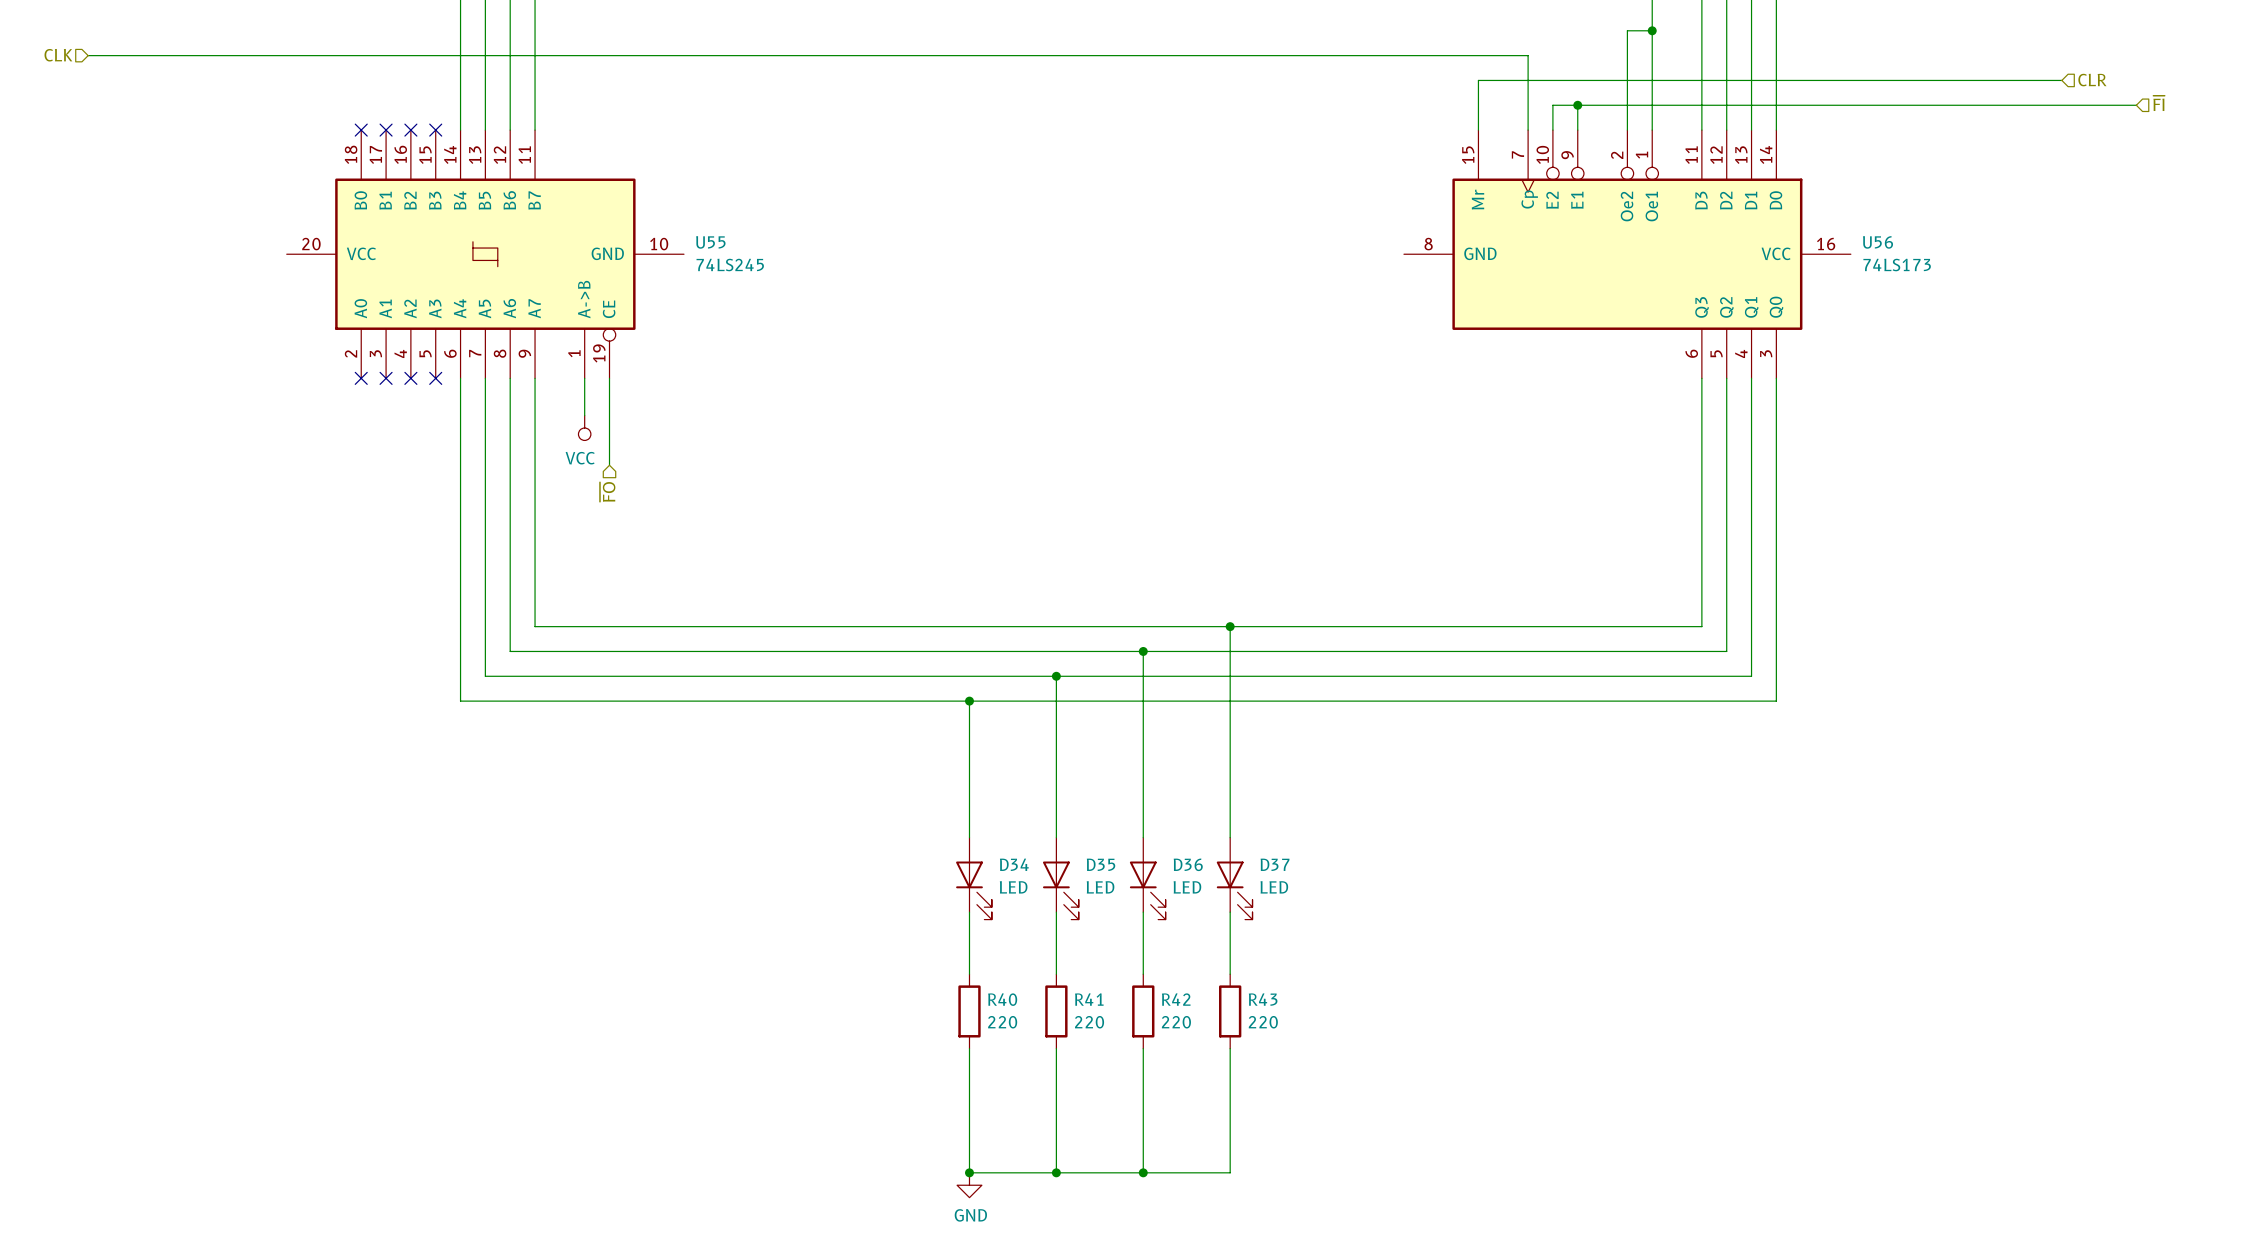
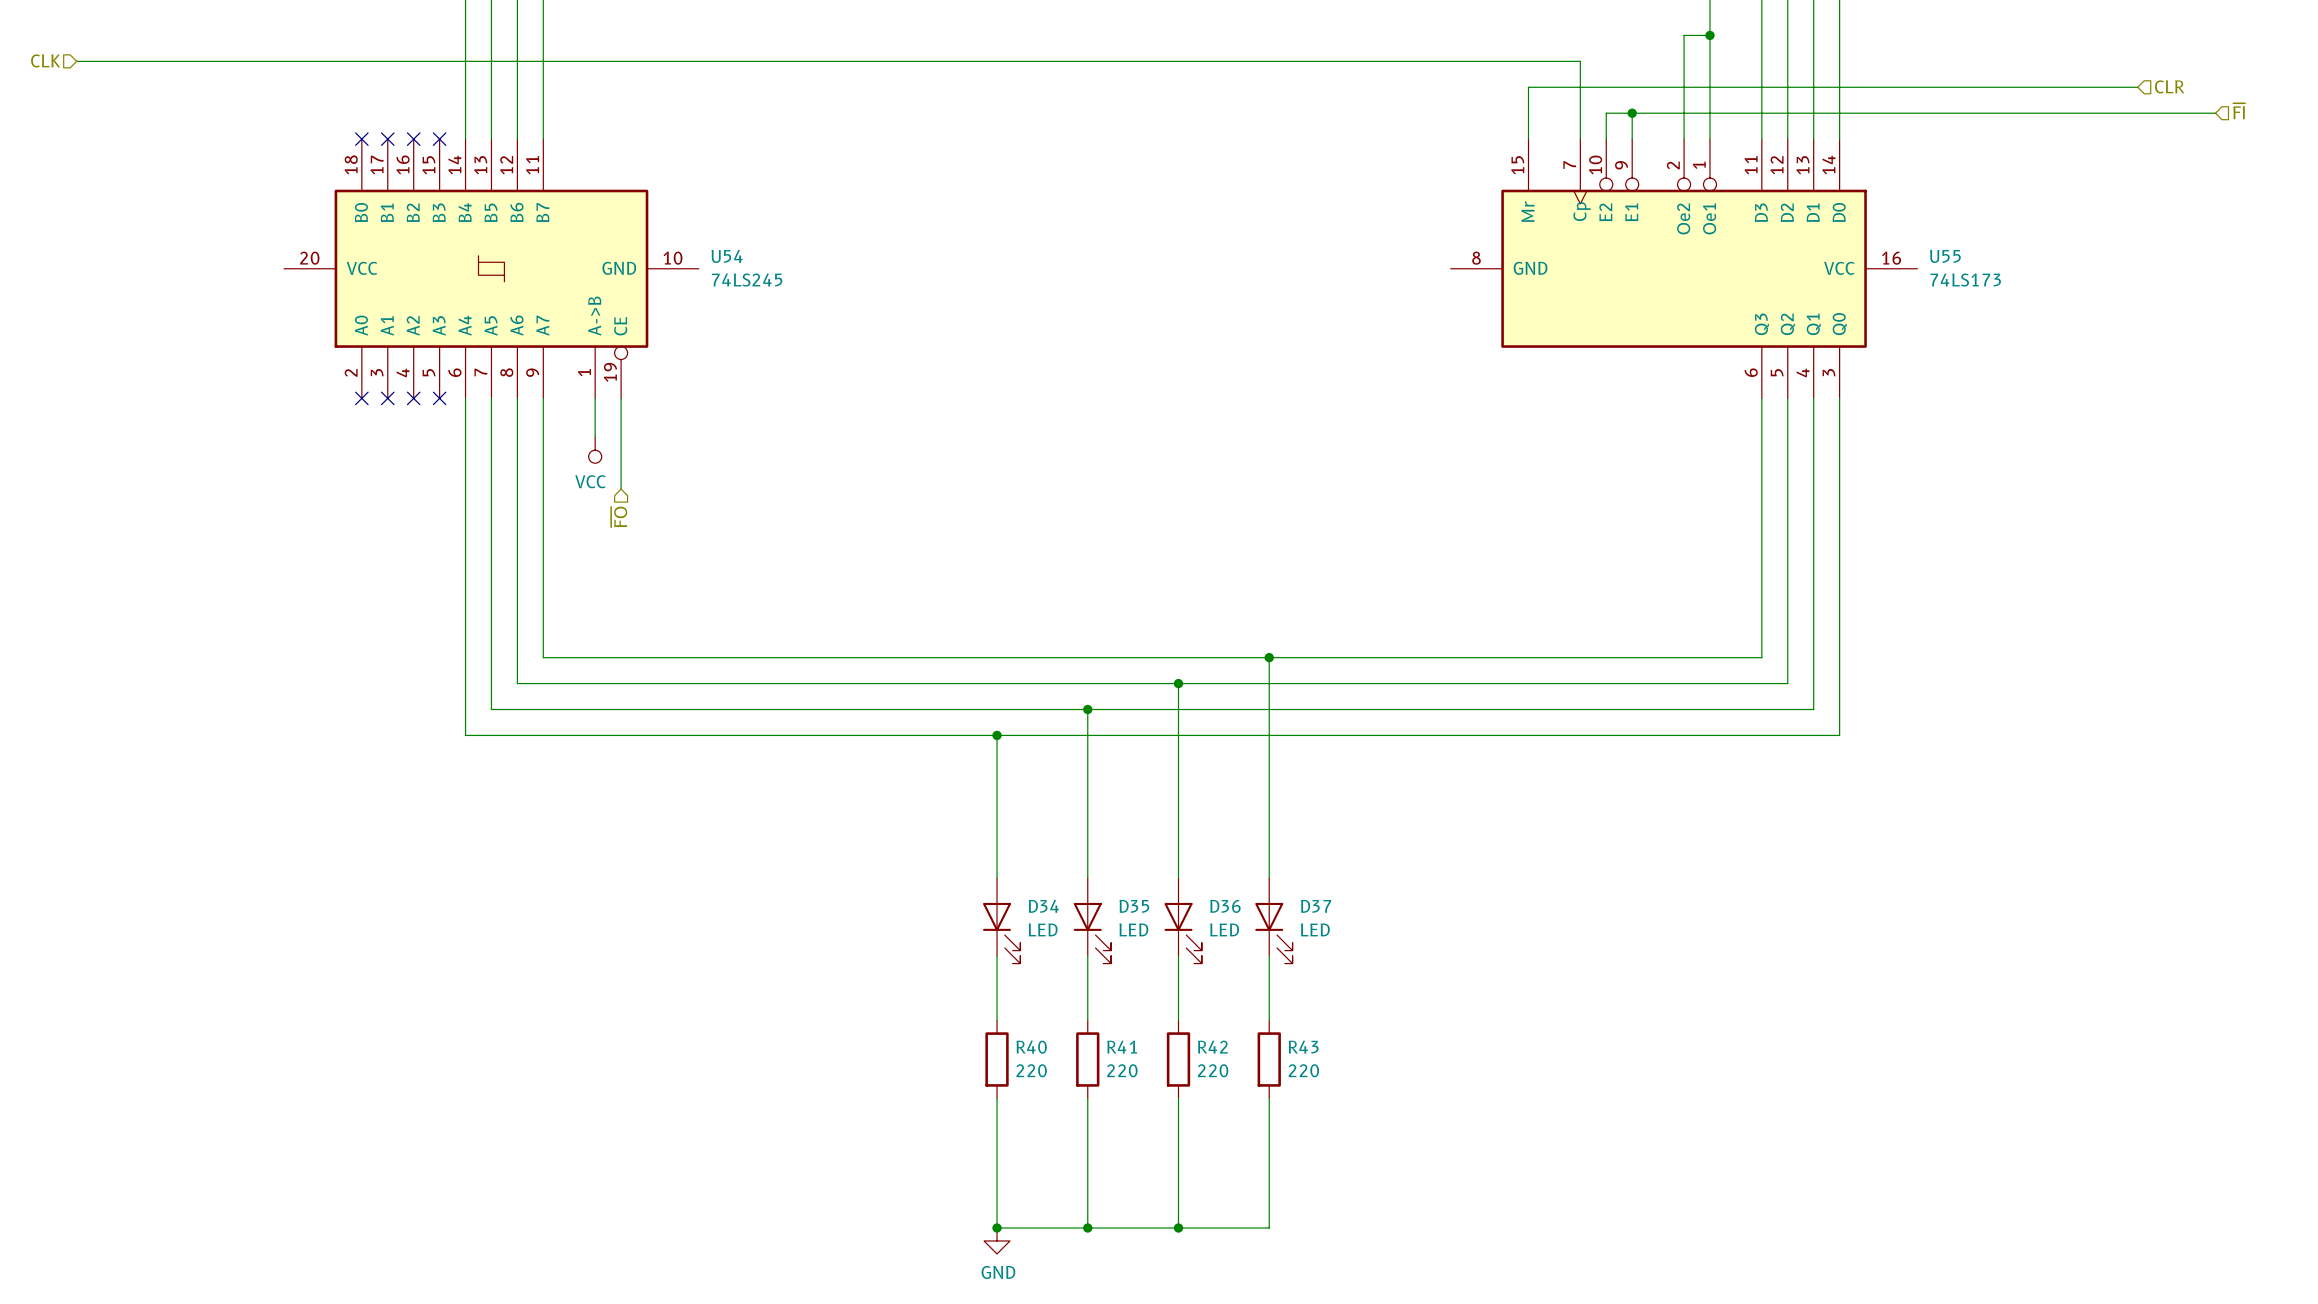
U55 name: U55 (710, 242) -> U54 (727, 256)
U56 name: U56 (1878, 242) -> U55 (1945, 256)

